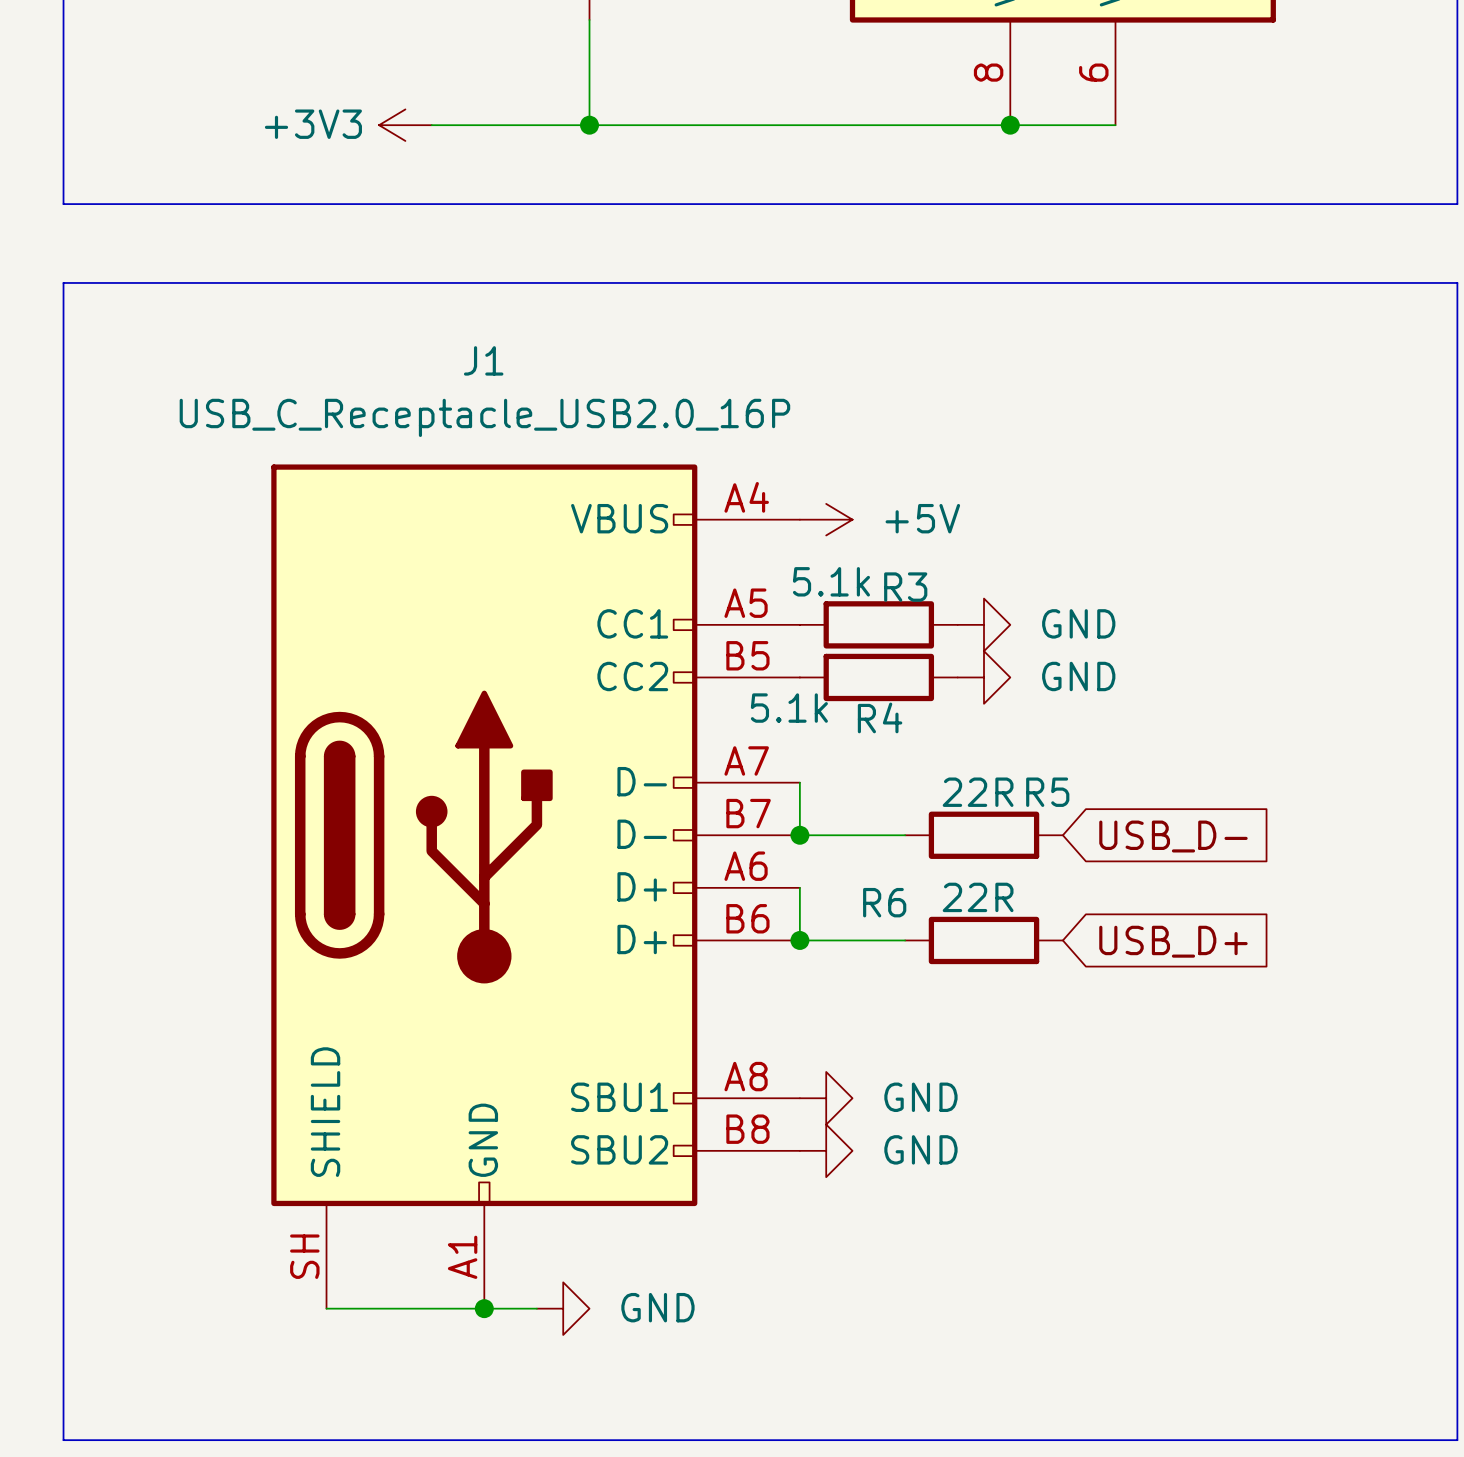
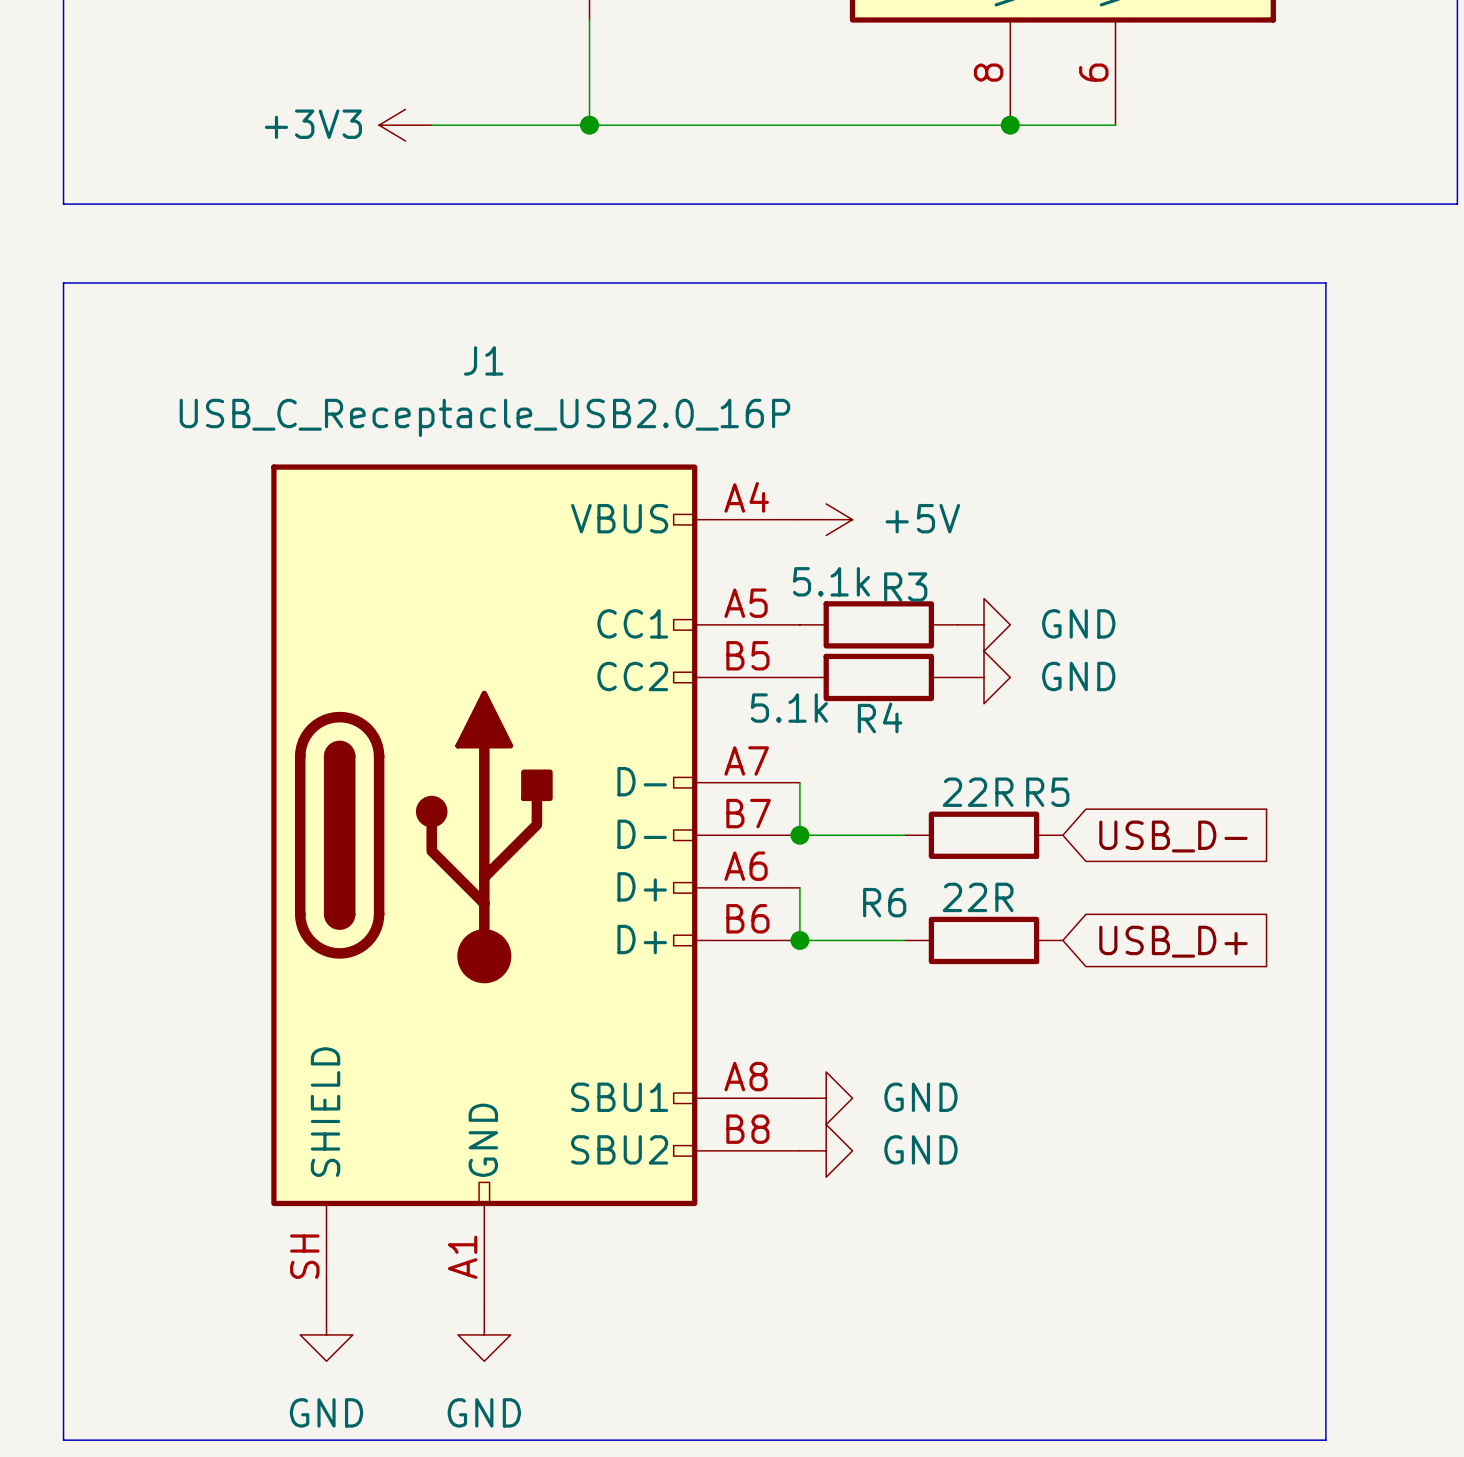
line: (1325, 282) (1457, 282) (1457, 1440) (1325, 1440) -> (1325, 282) (1325, 1440)
wire: (326, 1308) (536, 1308) -> none
junction: (484, 1308) -> none
power symbol rotation: 0° (563, 1308) -> 90° clockwise (484, 1334)
power symbol position: GND (563, 1308) -> GND (484, 1334)
power symbol: none -> GND (326, 1334)

